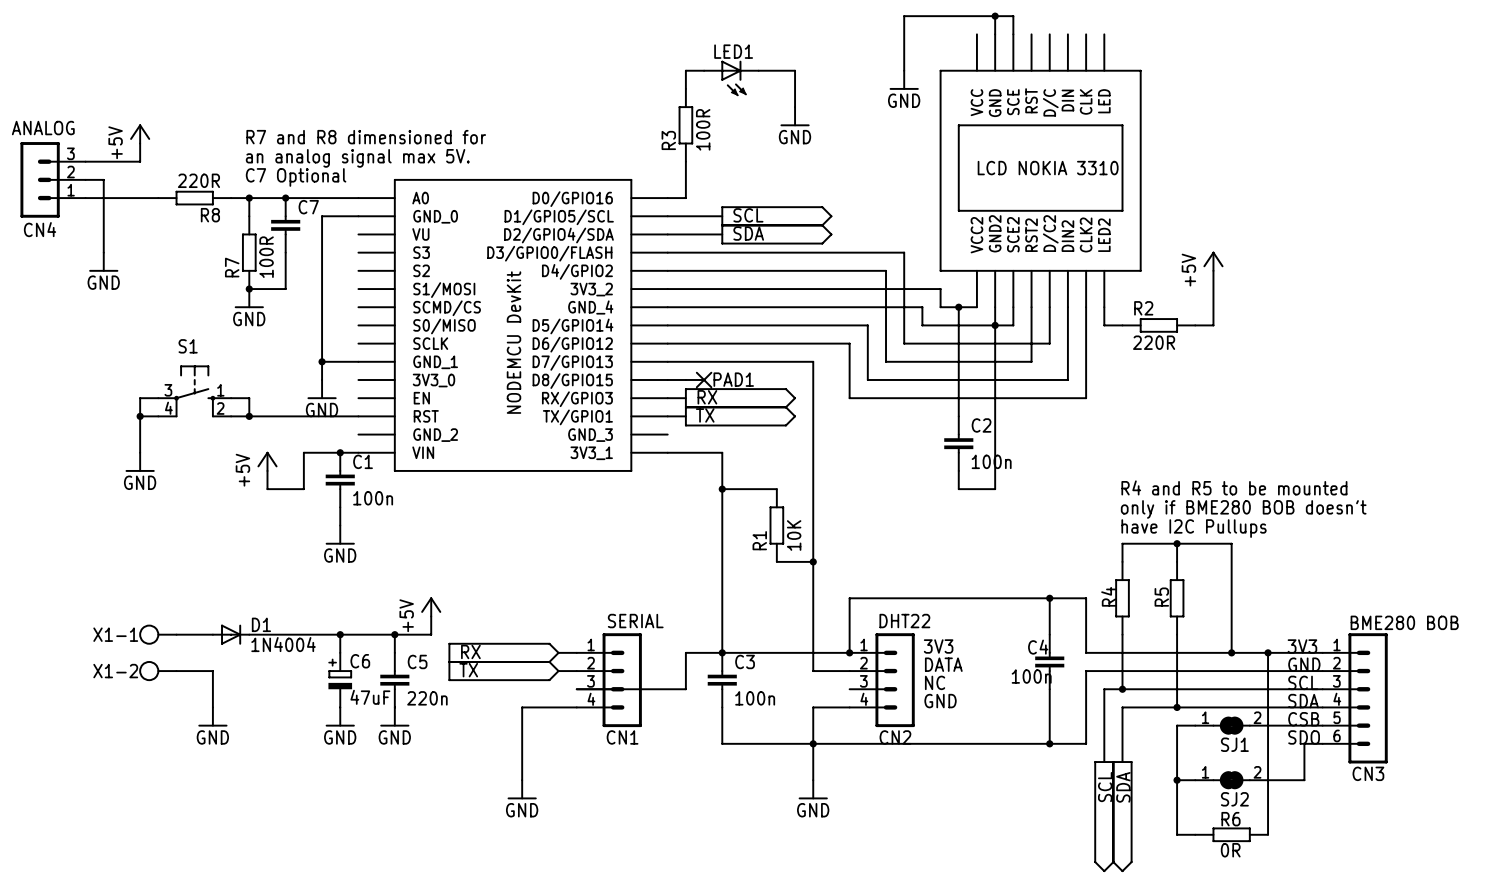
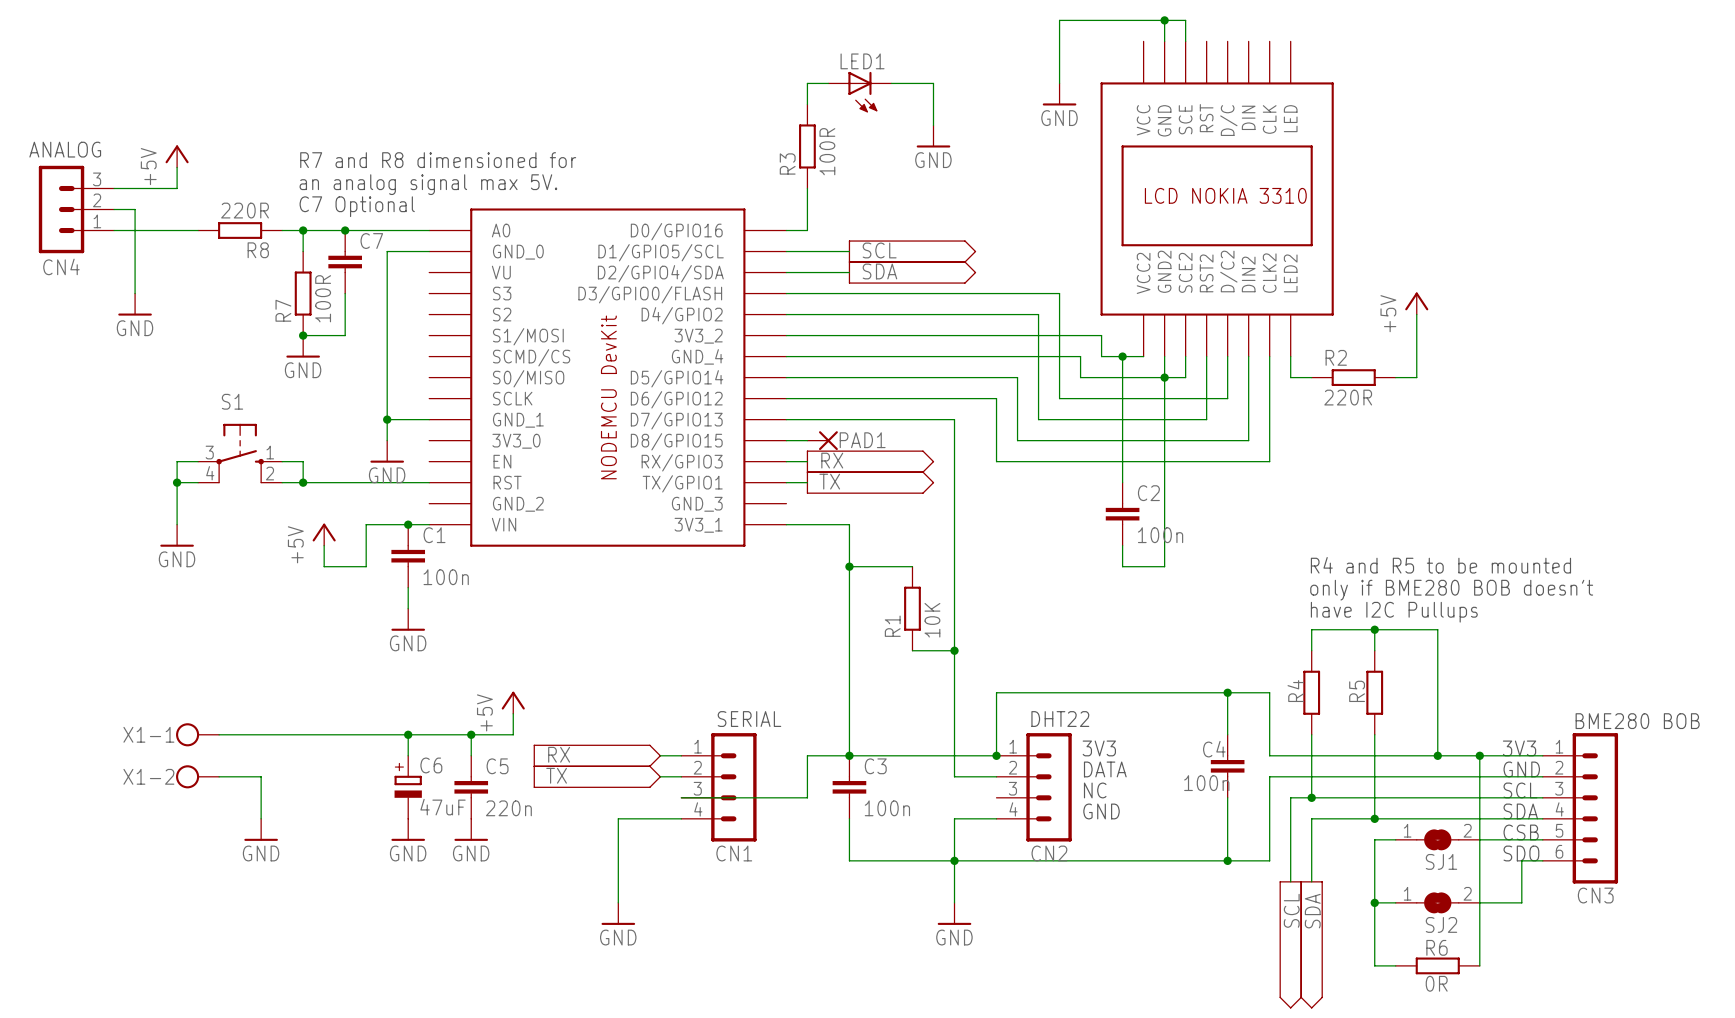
D1: 1N4004 (231, 634) -> none

